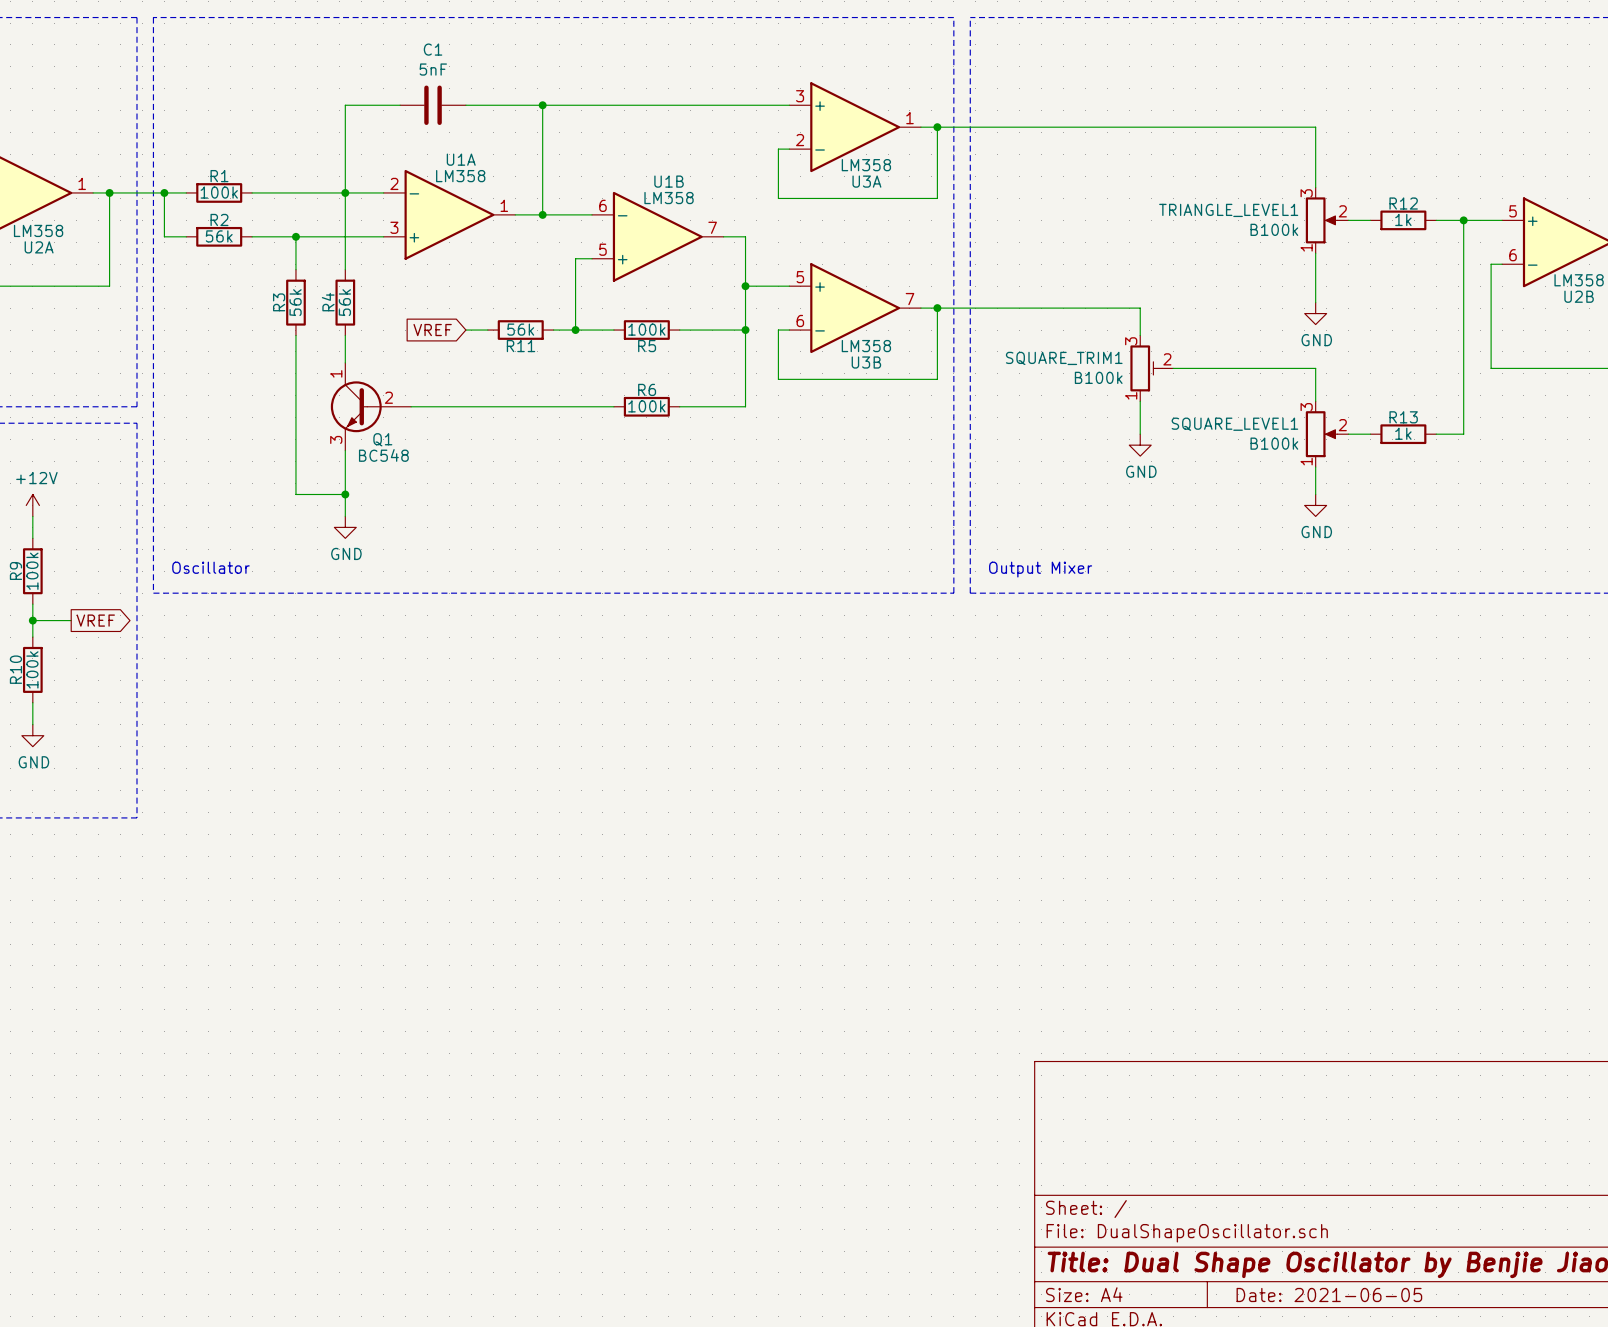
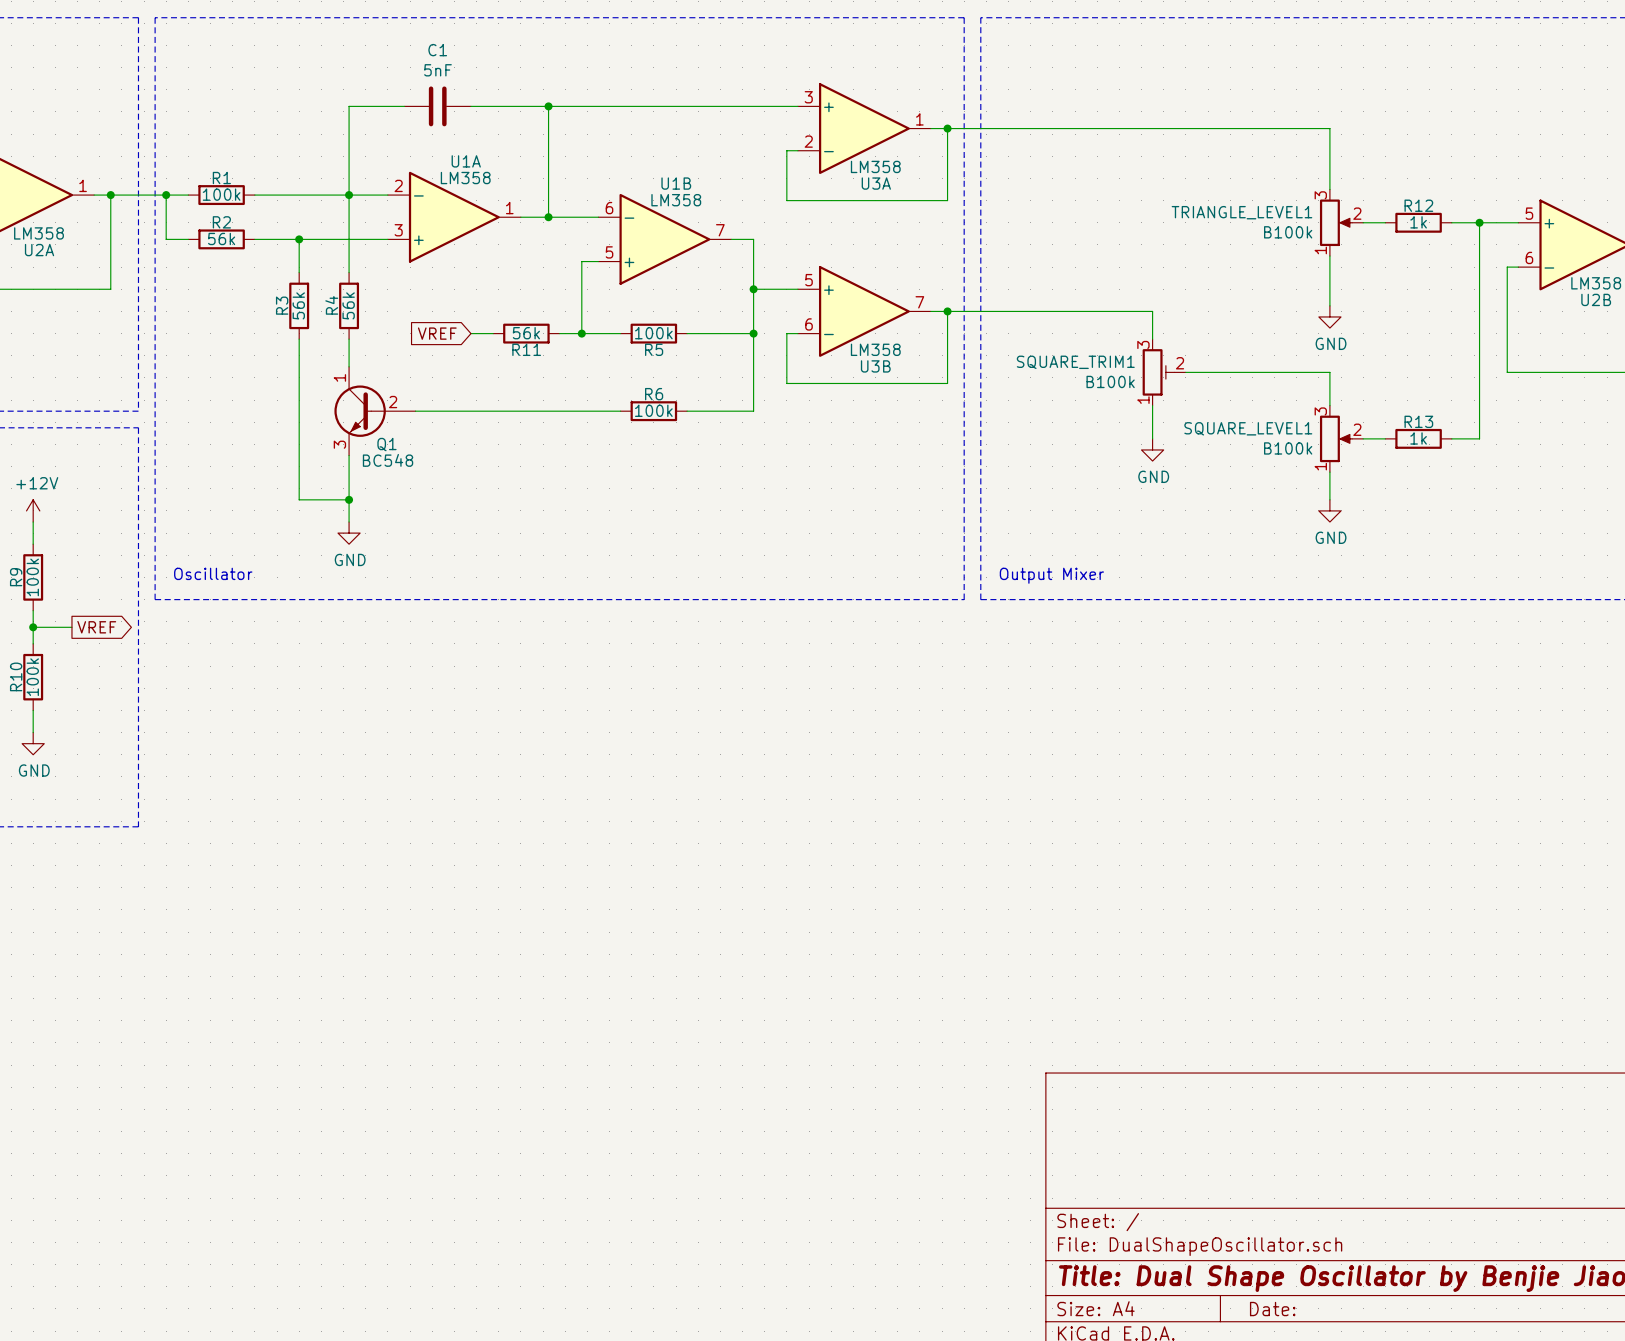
title block: Date: 2021-06-05 (1329, 1294) -> Date: (1272, 1309)

